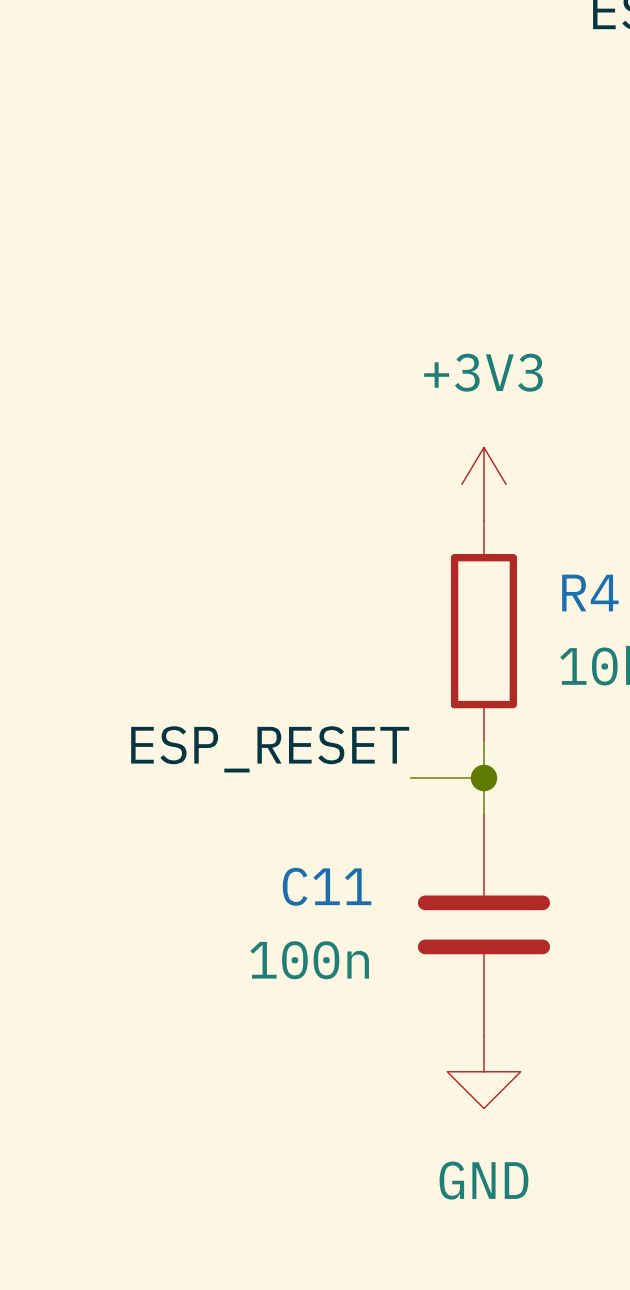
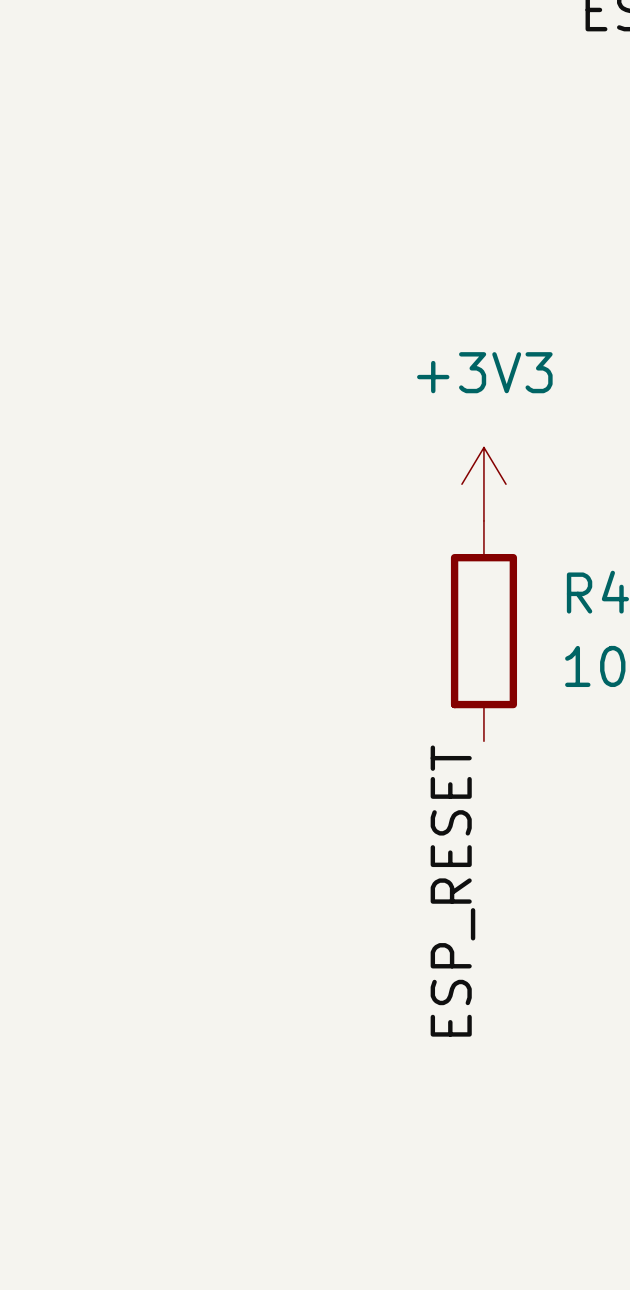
wire: (483, 741) (483, 814) -> none
label rotation: 0° (270, 749) -> 90° counterclockwise (452, 891)
wire: (410, 778) (483, 778) -> none
junction: (483, 778) -> none
C11: 100n (483, 924) -> none
power symbol: GND (483, 1071) -> none

